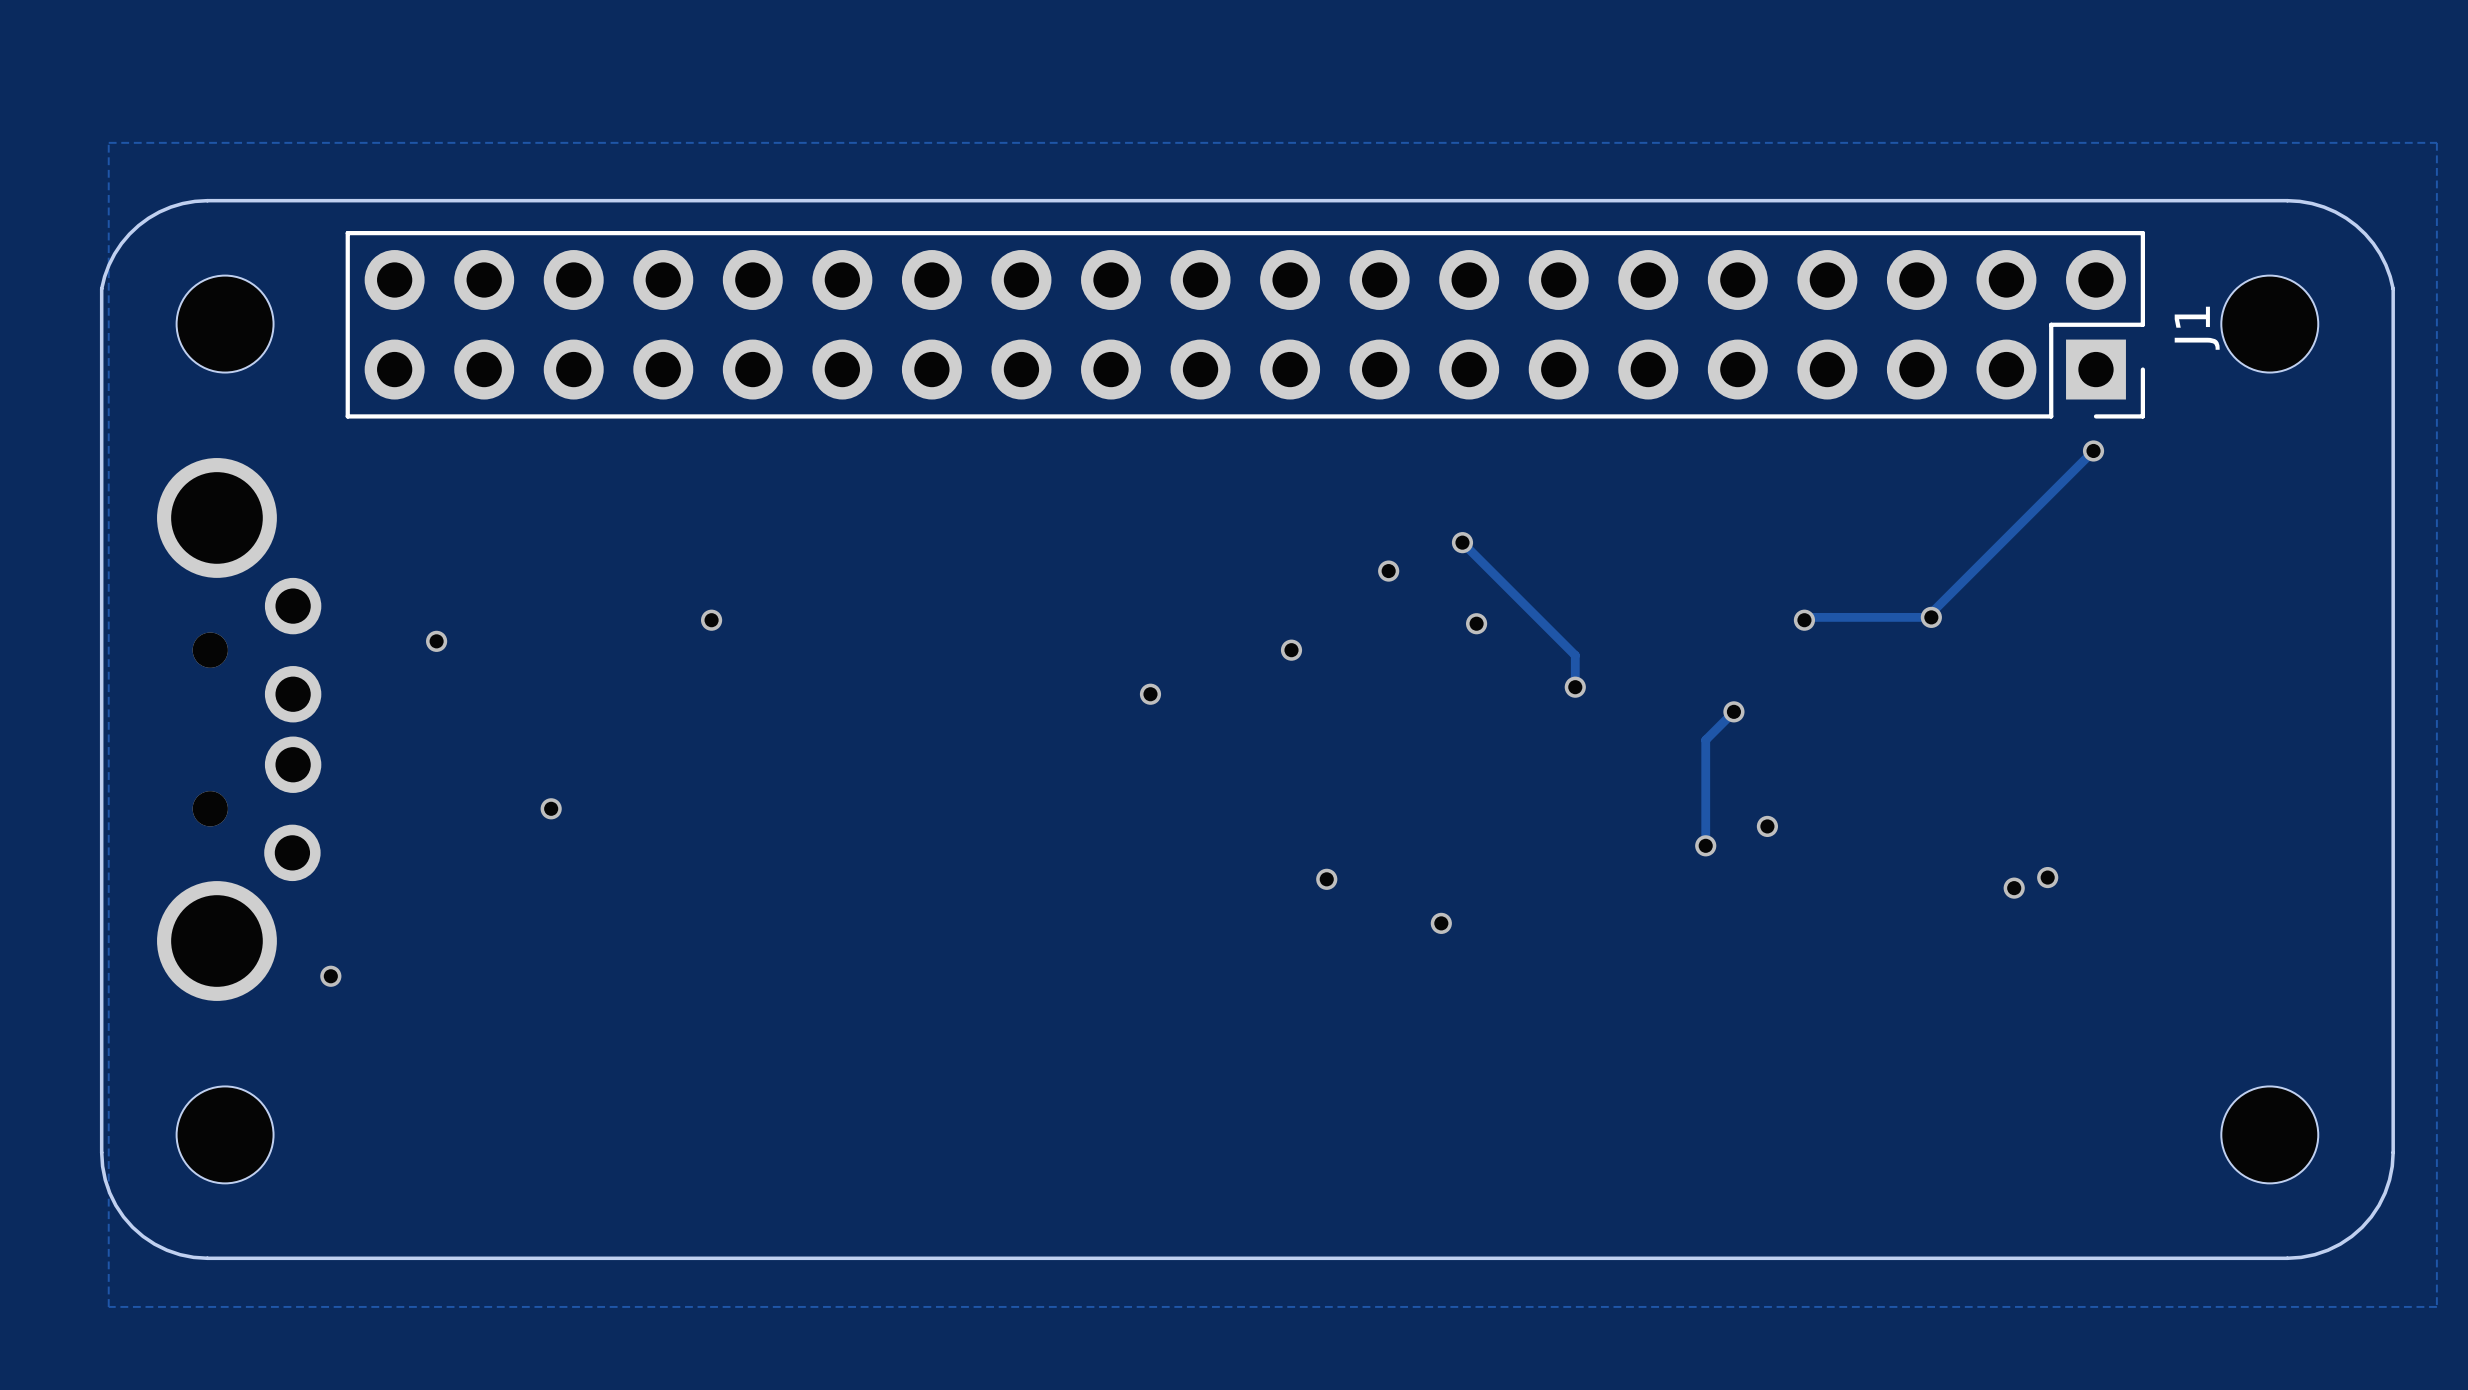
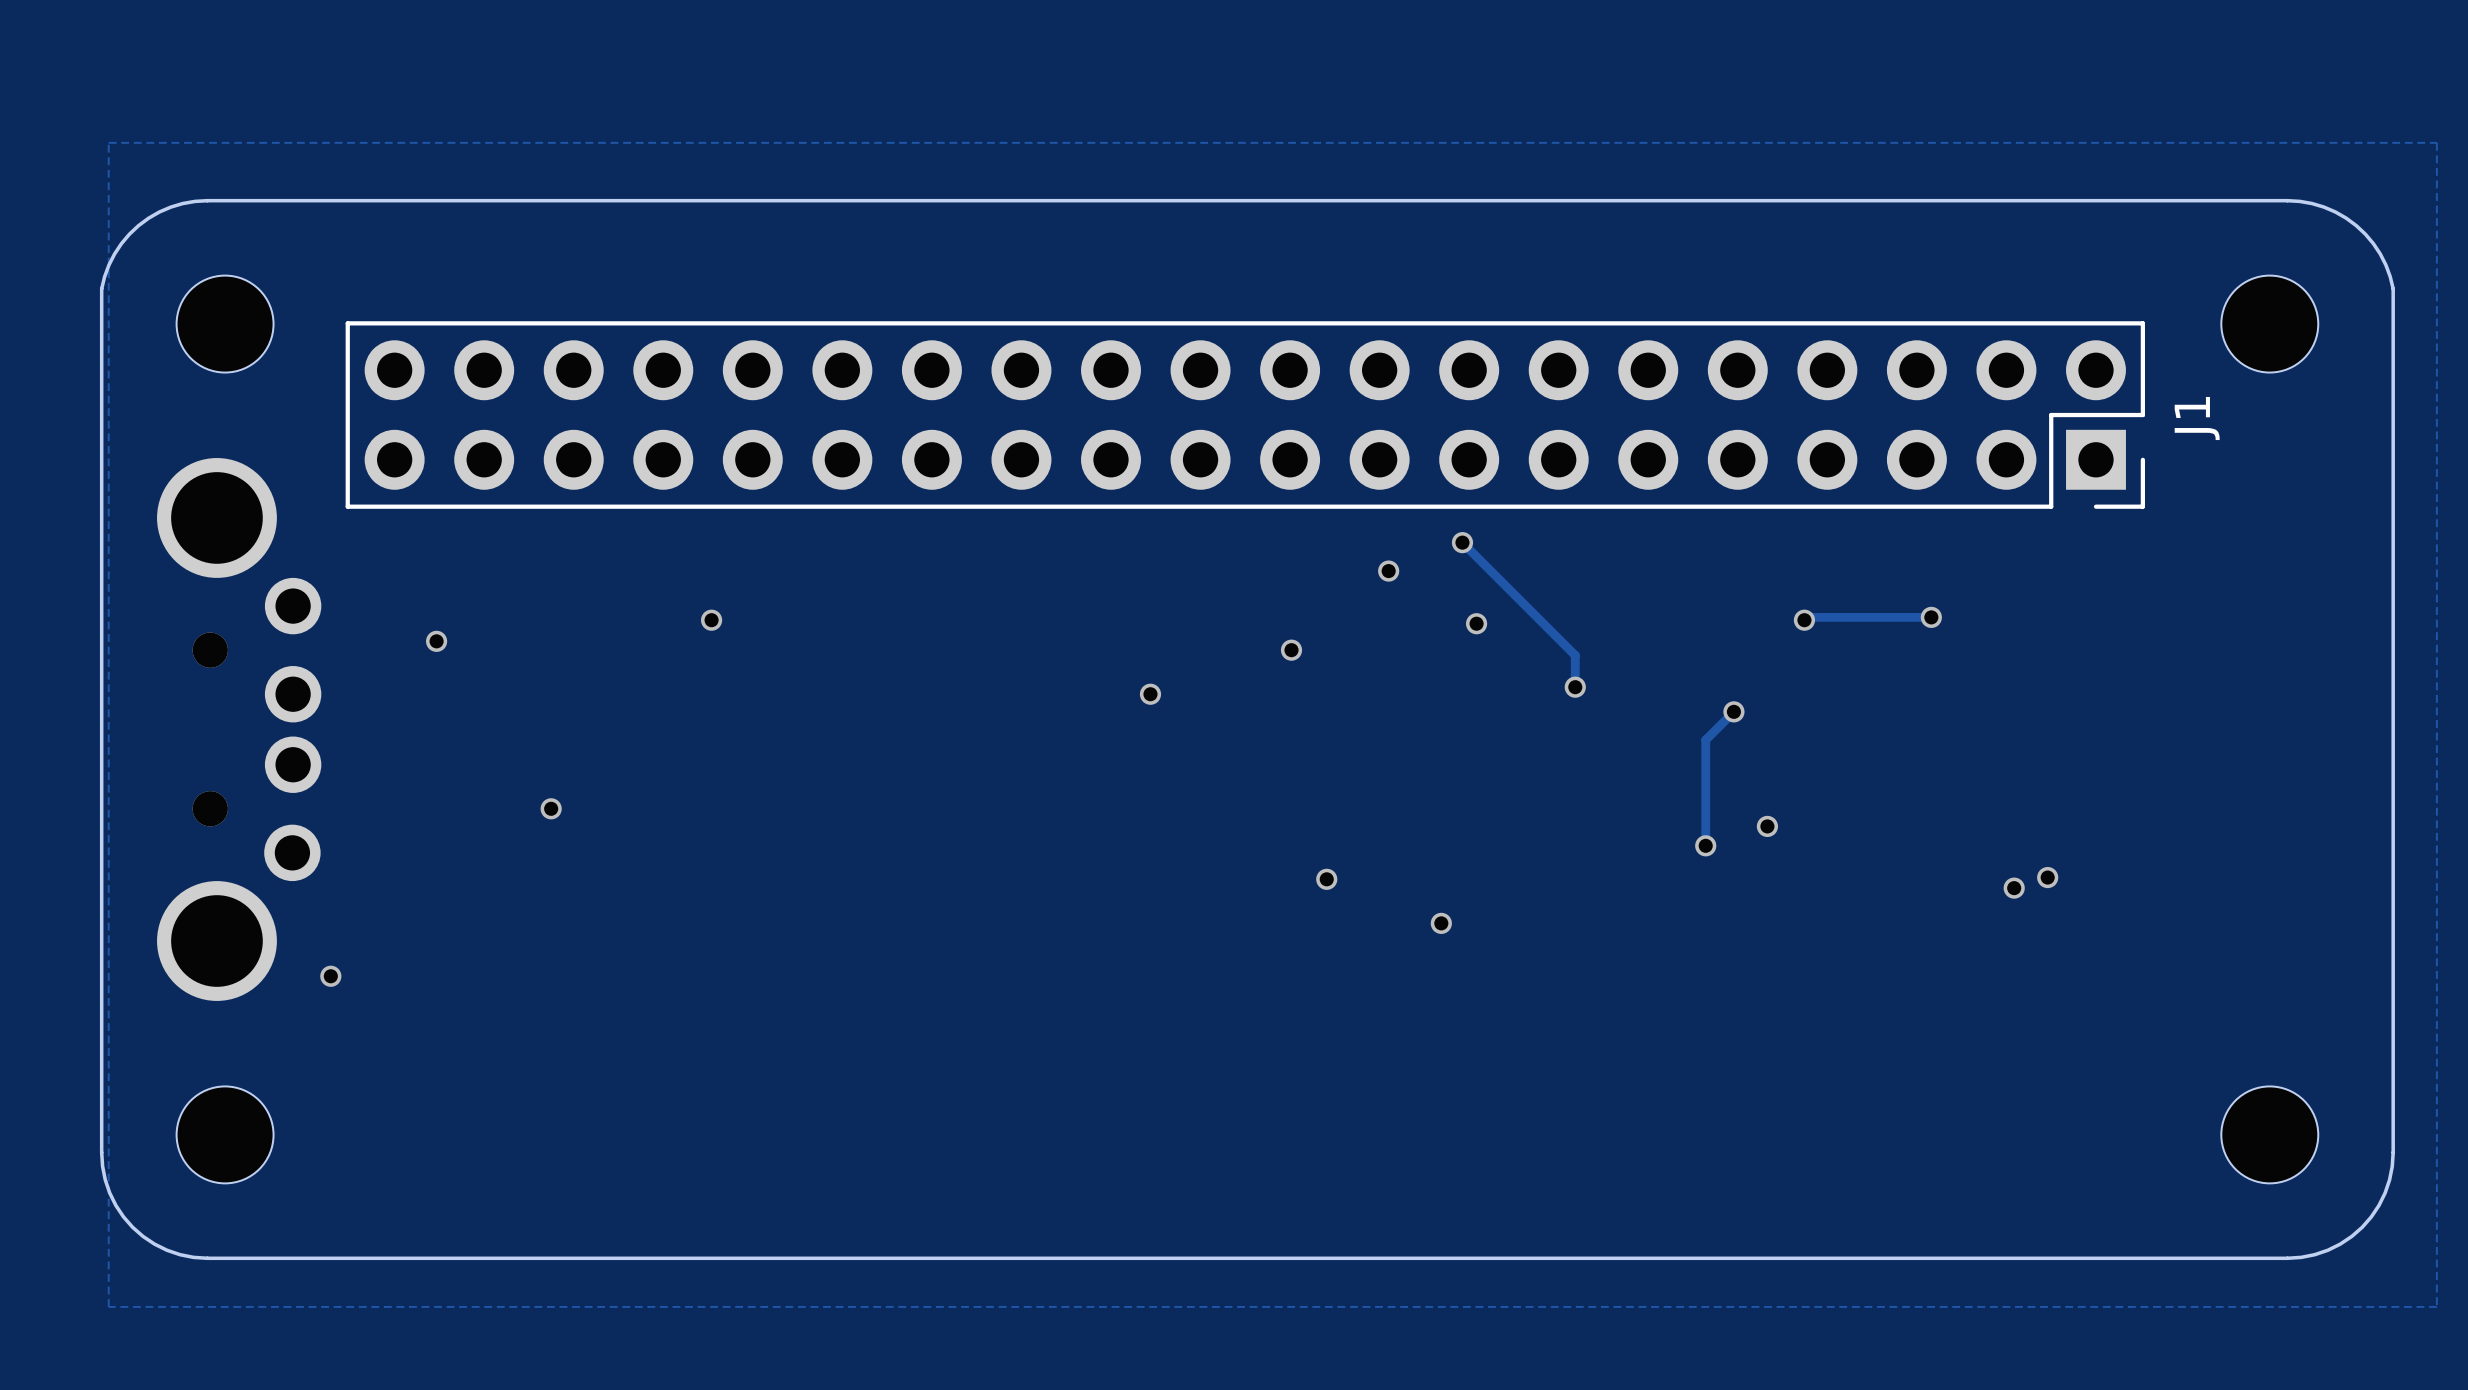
J1 position: (1245, 324) -> (1245, 415)
track: (2093, 450) (1931, 613) (1931, 617) -> none
via: (2093, 450) -> none

